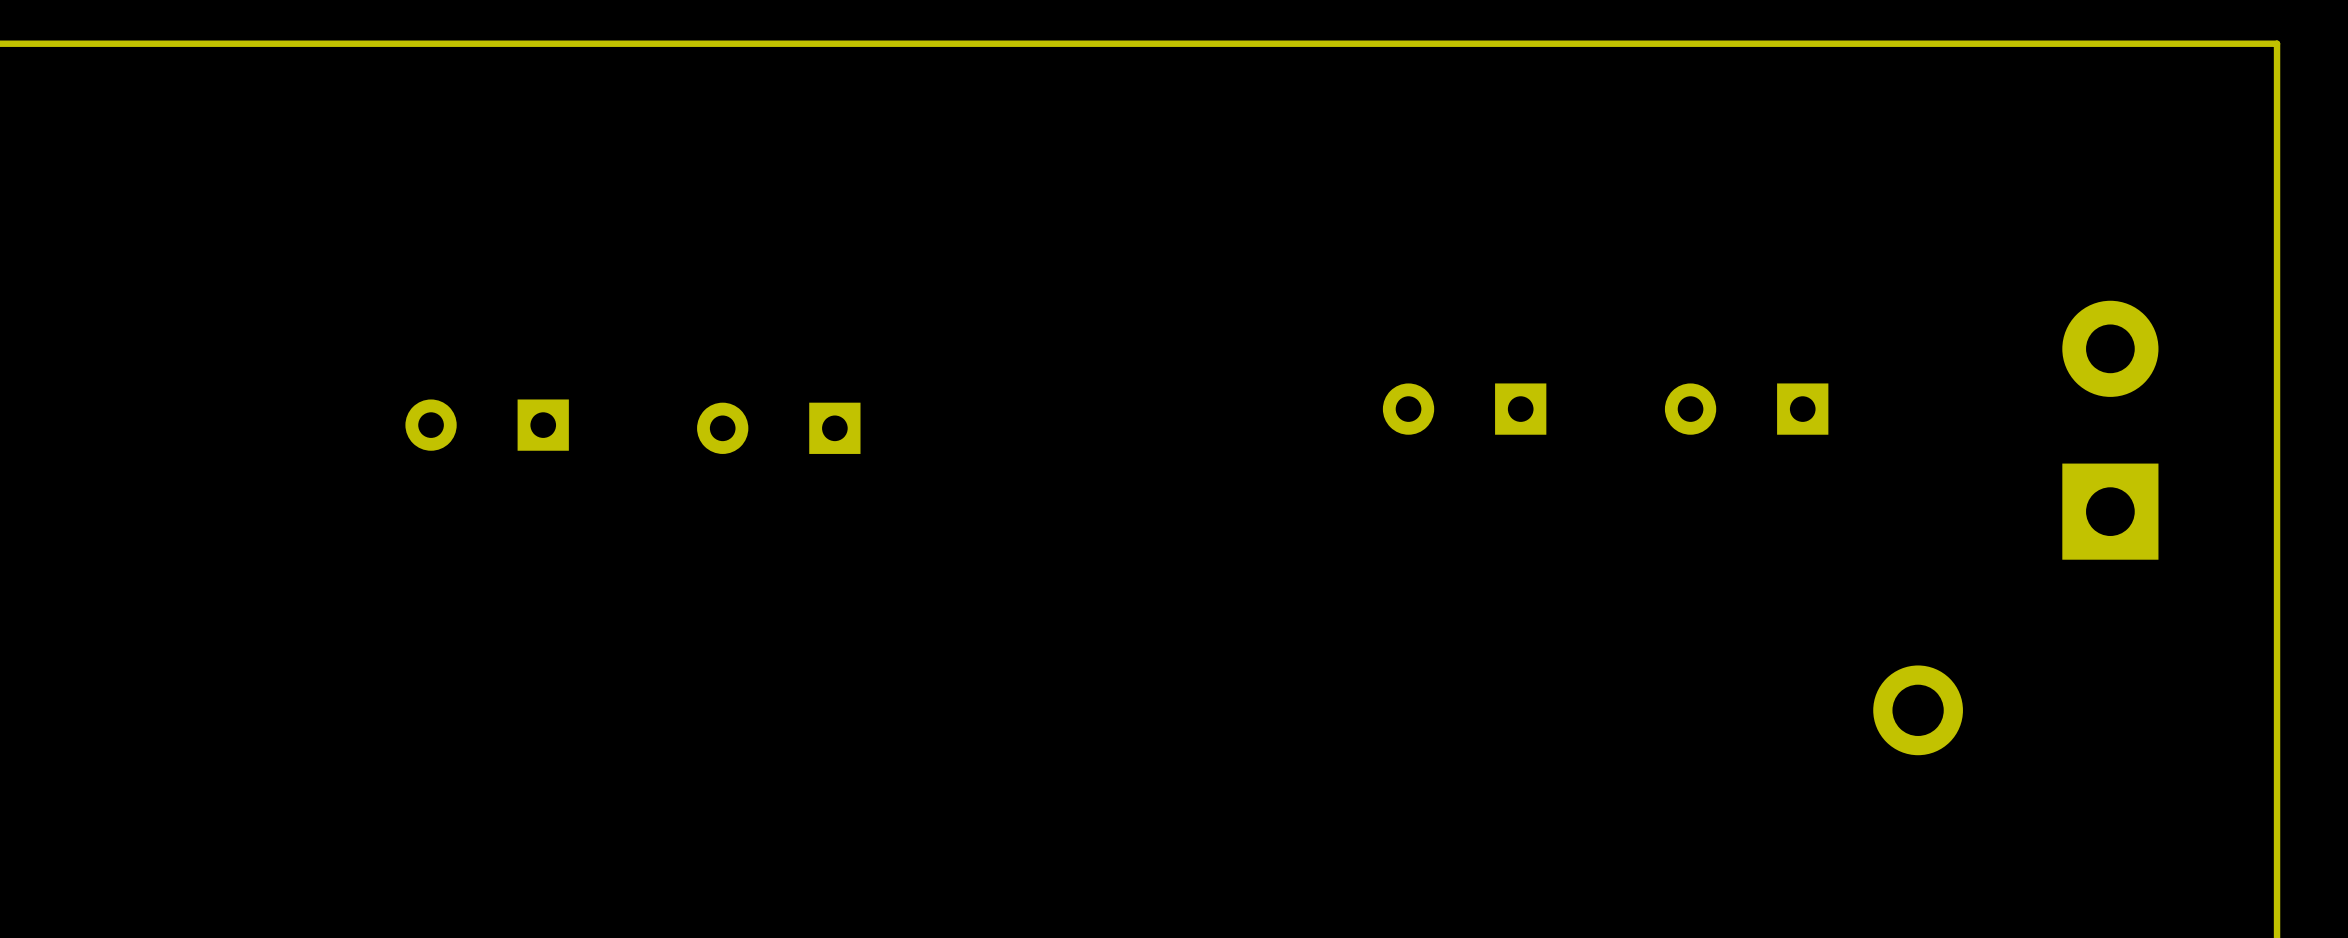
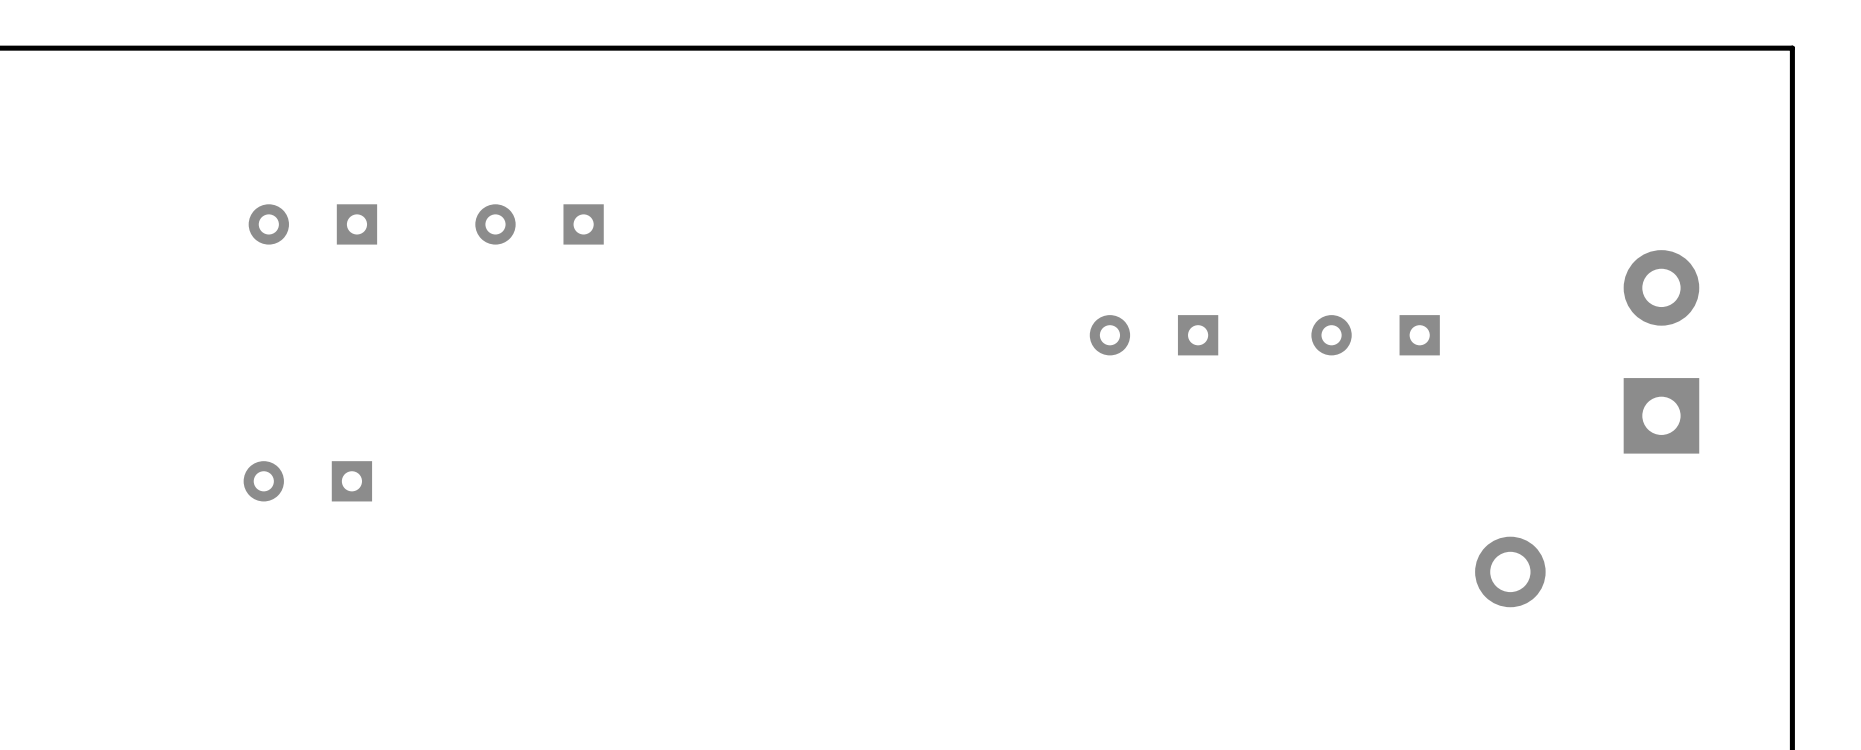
part: none -> (312, 224)
part: none -> (539, 224)
part: (487, 425) -> none
part: (778, 428) -> none
part: none -> (307, 481)

